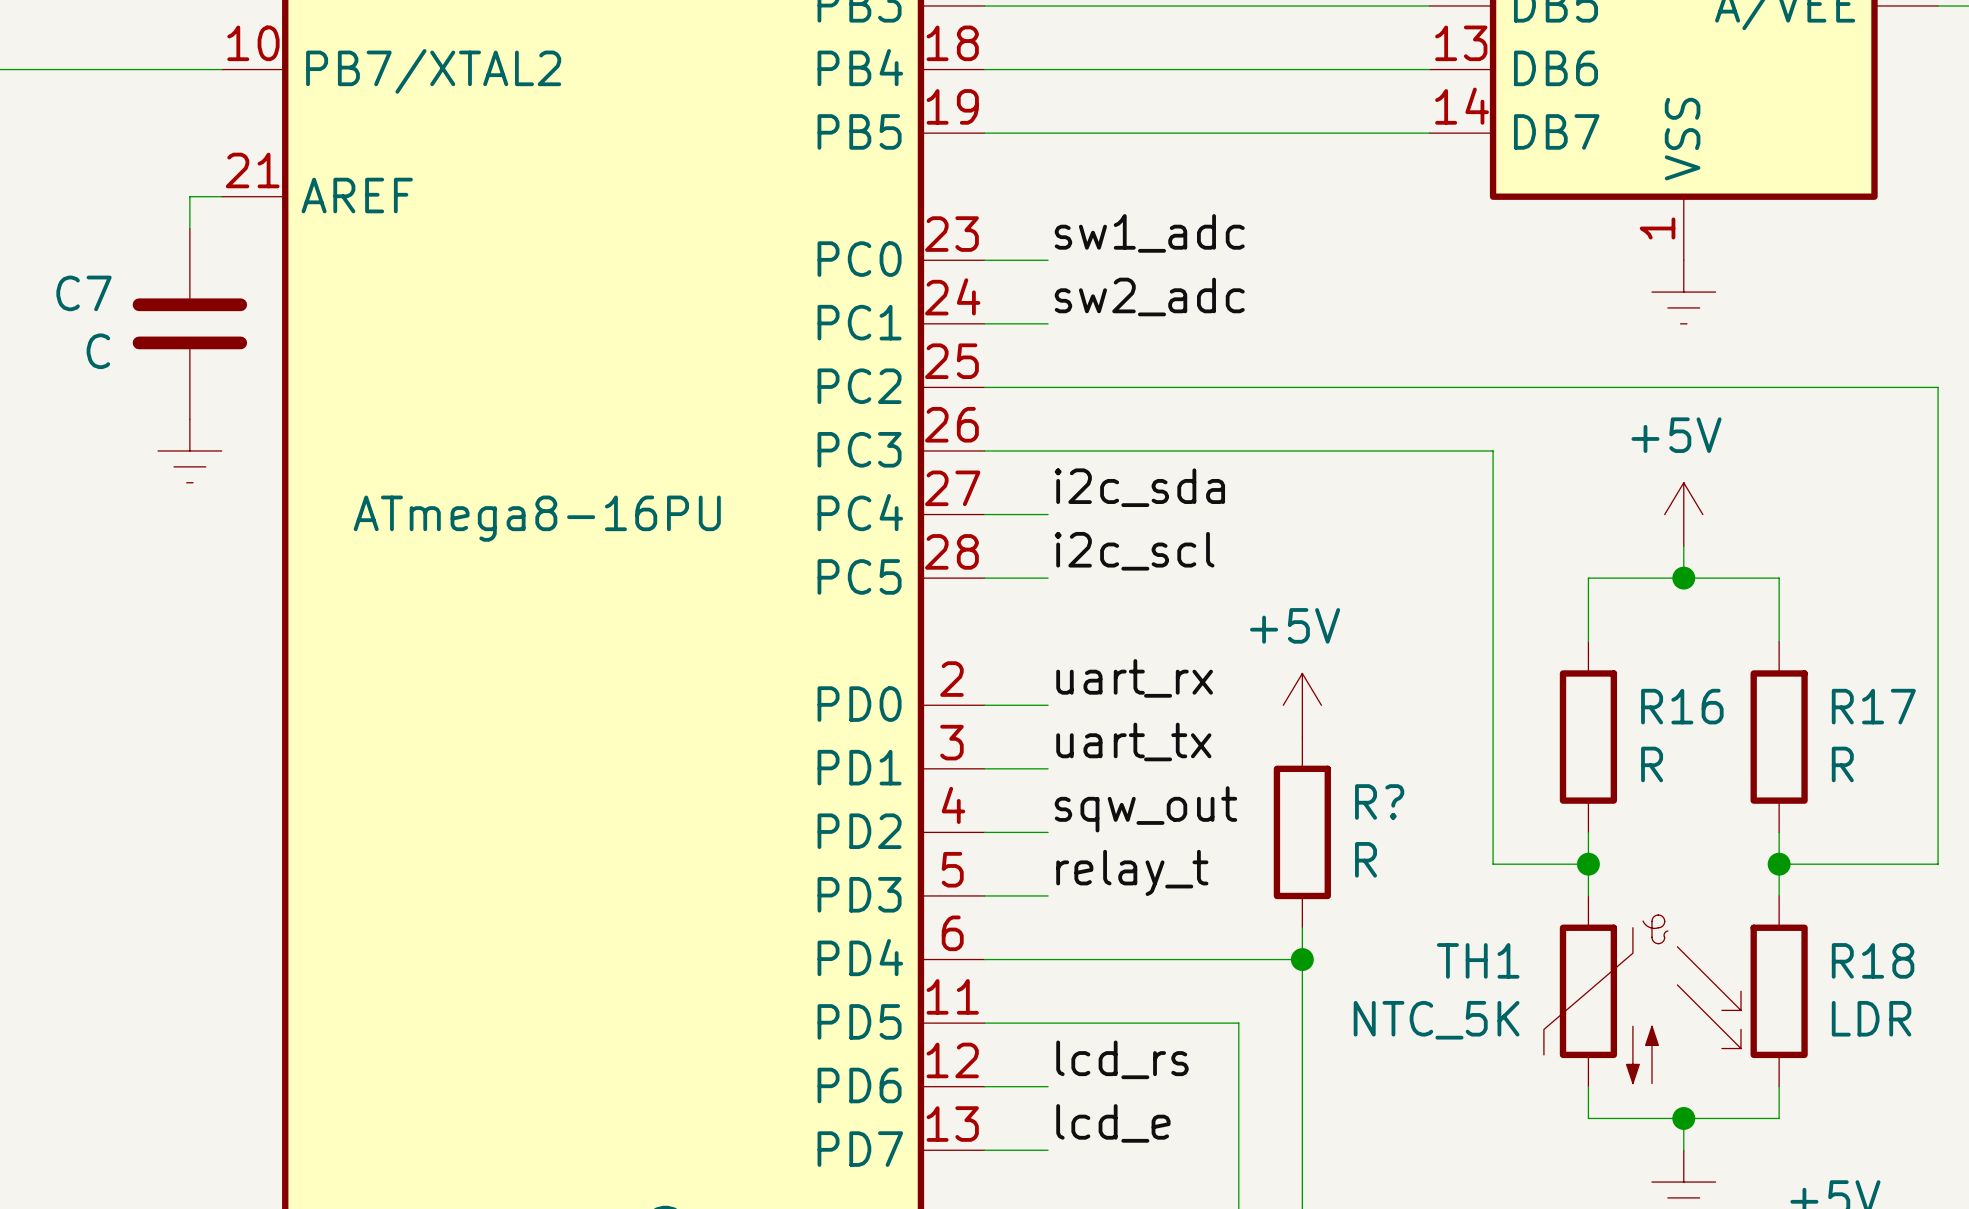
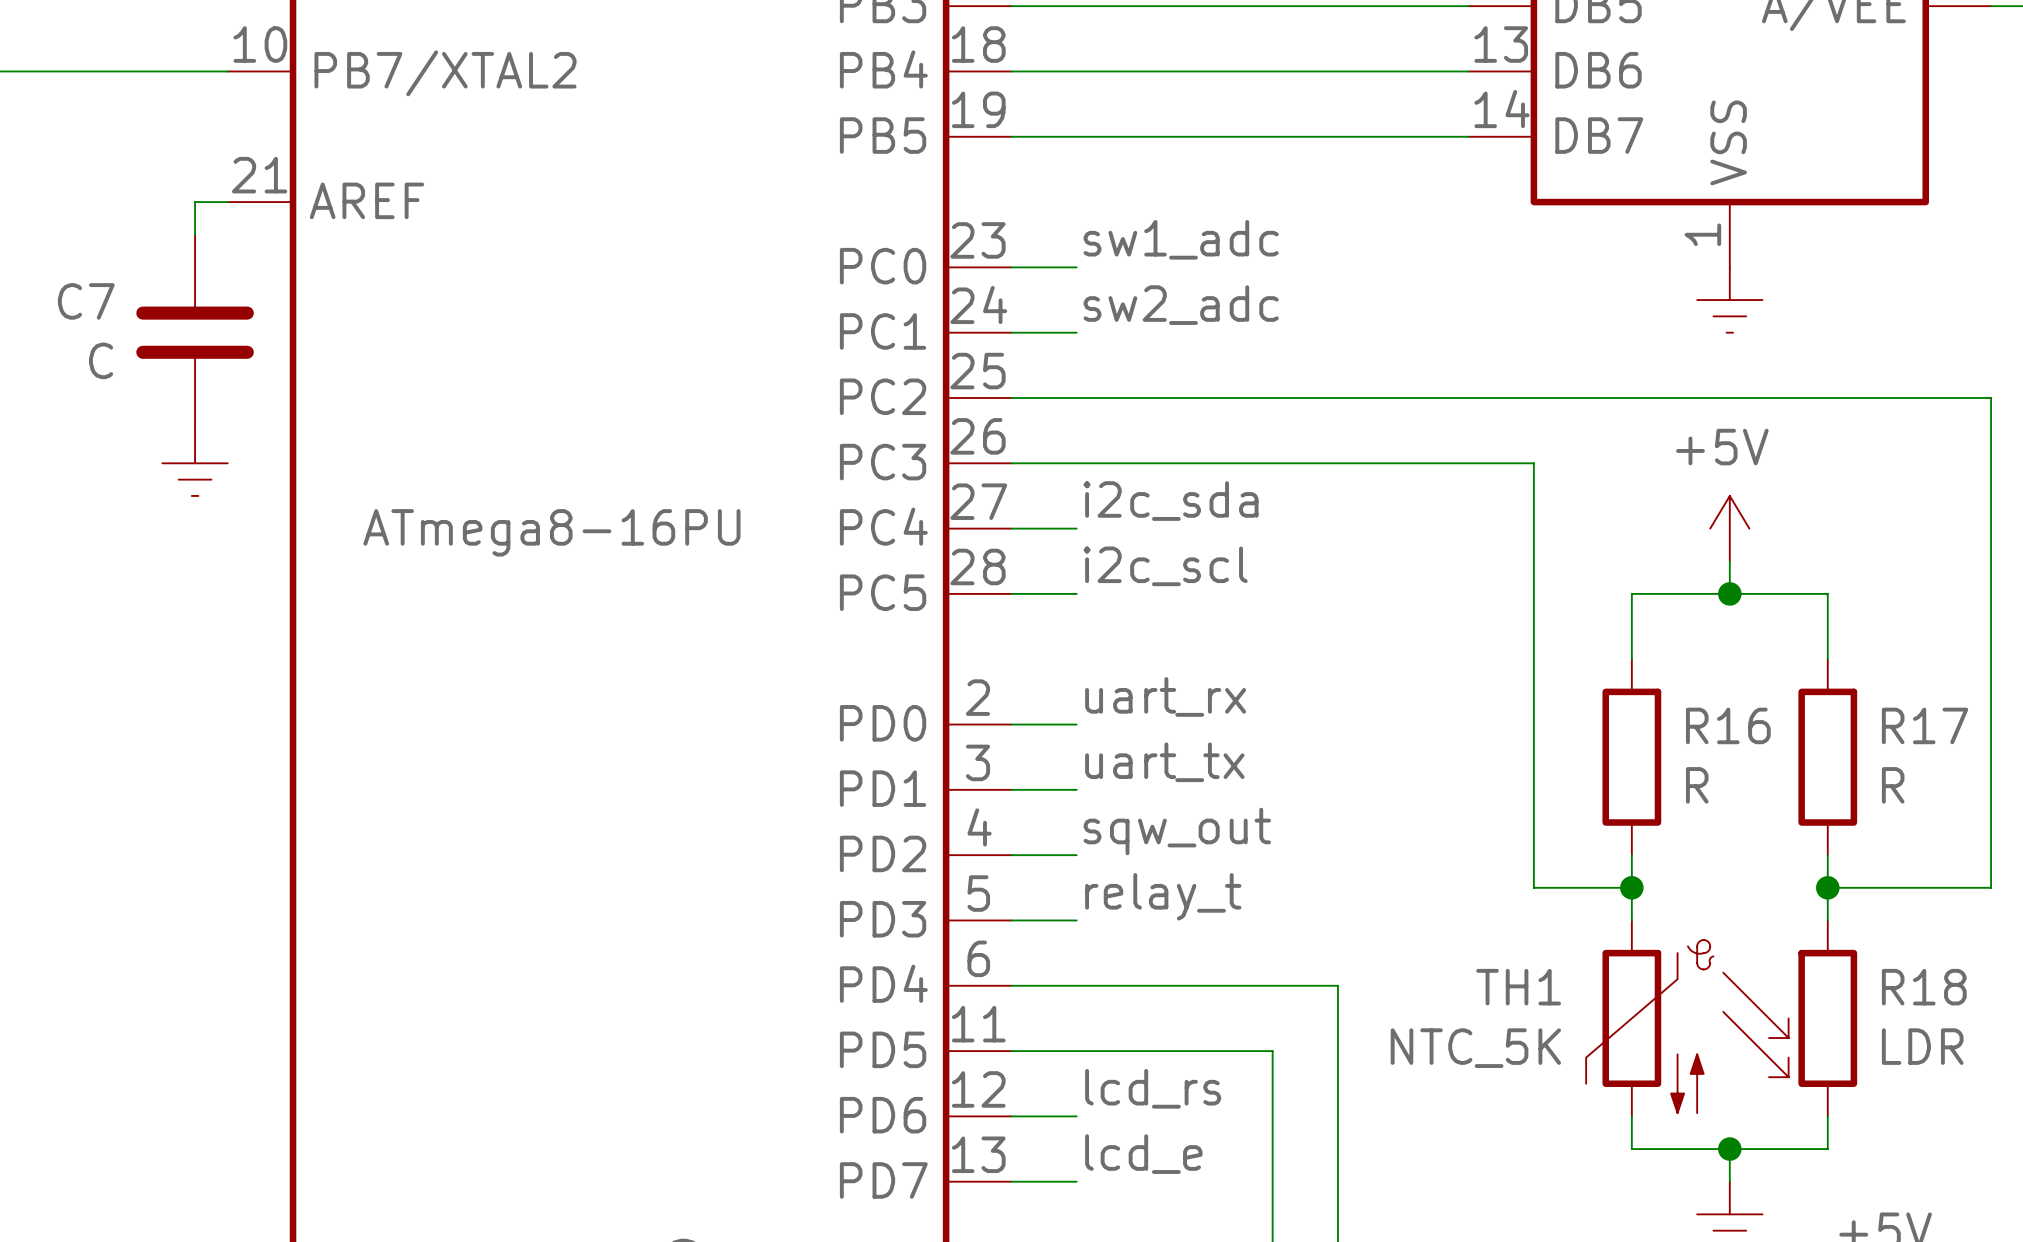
power symbol: +5V (1302, 705) -> none
R?: R (1302, 832) -> none
wire: (1302, 927) (1302, 959) -> none
junction: (1302, 959) -> none

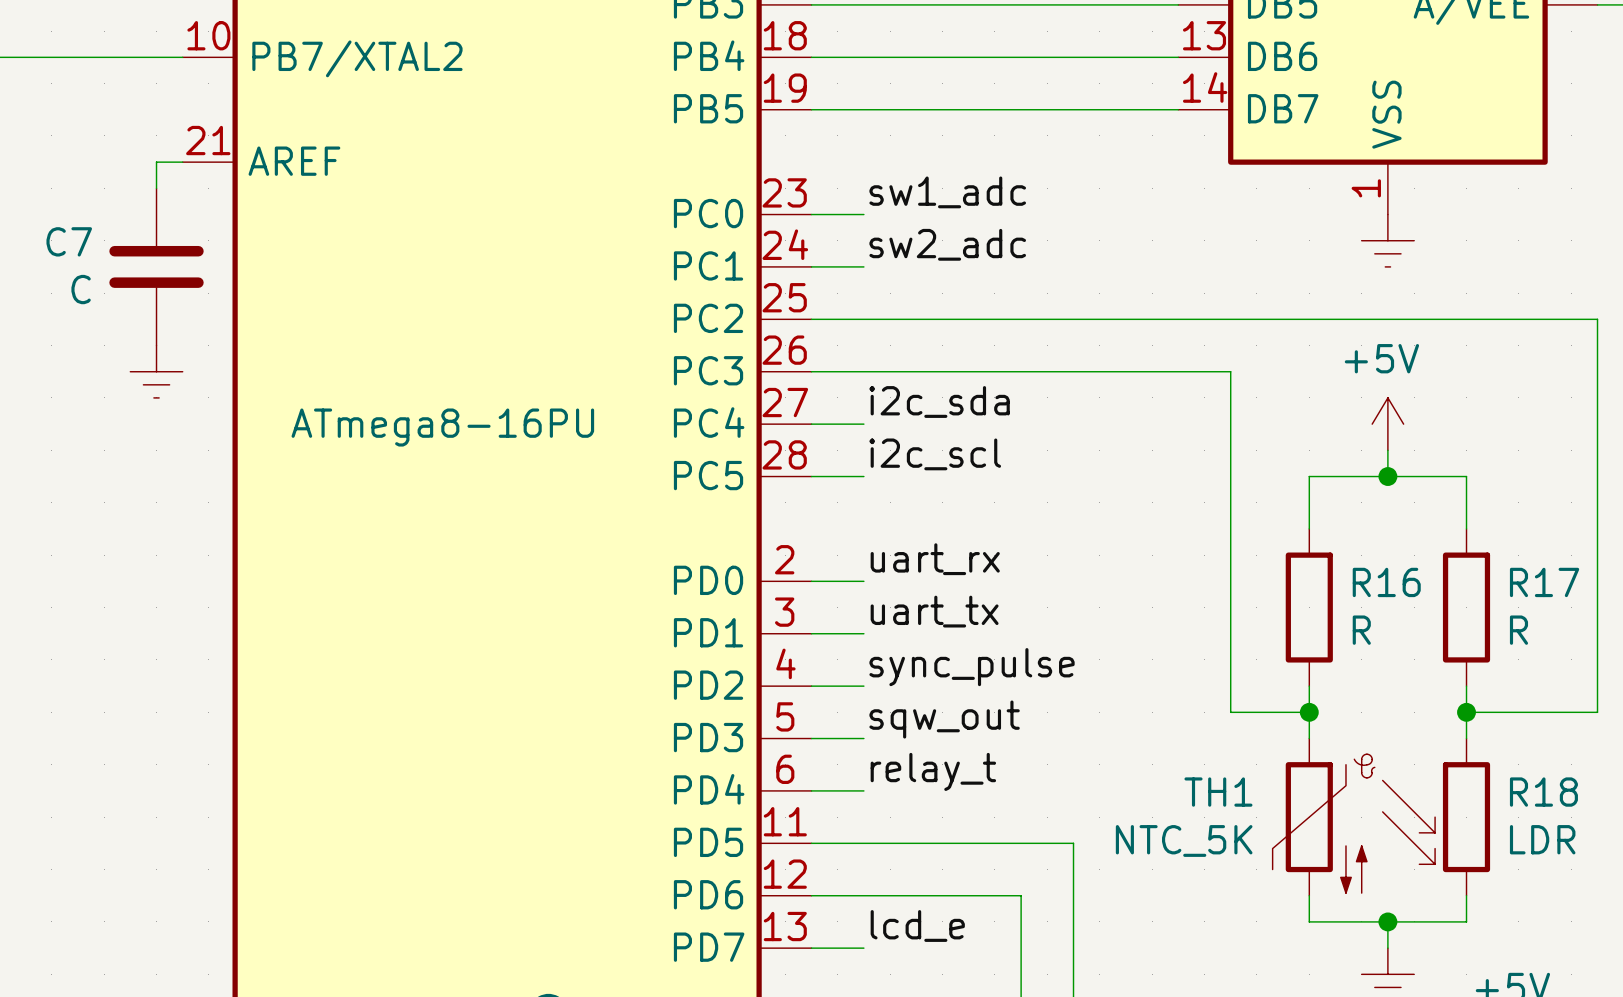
label: sqw_out (1177, 831) -> sync_pulse (972, 667)
label: relay_t (1163, 896) -> sqw_out (944, 719)
label: none -> relay_t (933, 771)
wire: (1076, 985) (1337, 985) (1337, 1051) -> none
wire: (1272, 1051) (1272, 1116) -> (1021, 843) (1073, 843)
label: lcd_rs (1153, 1088) -> none
wire: none -> (863, 895) (1021, 895)

